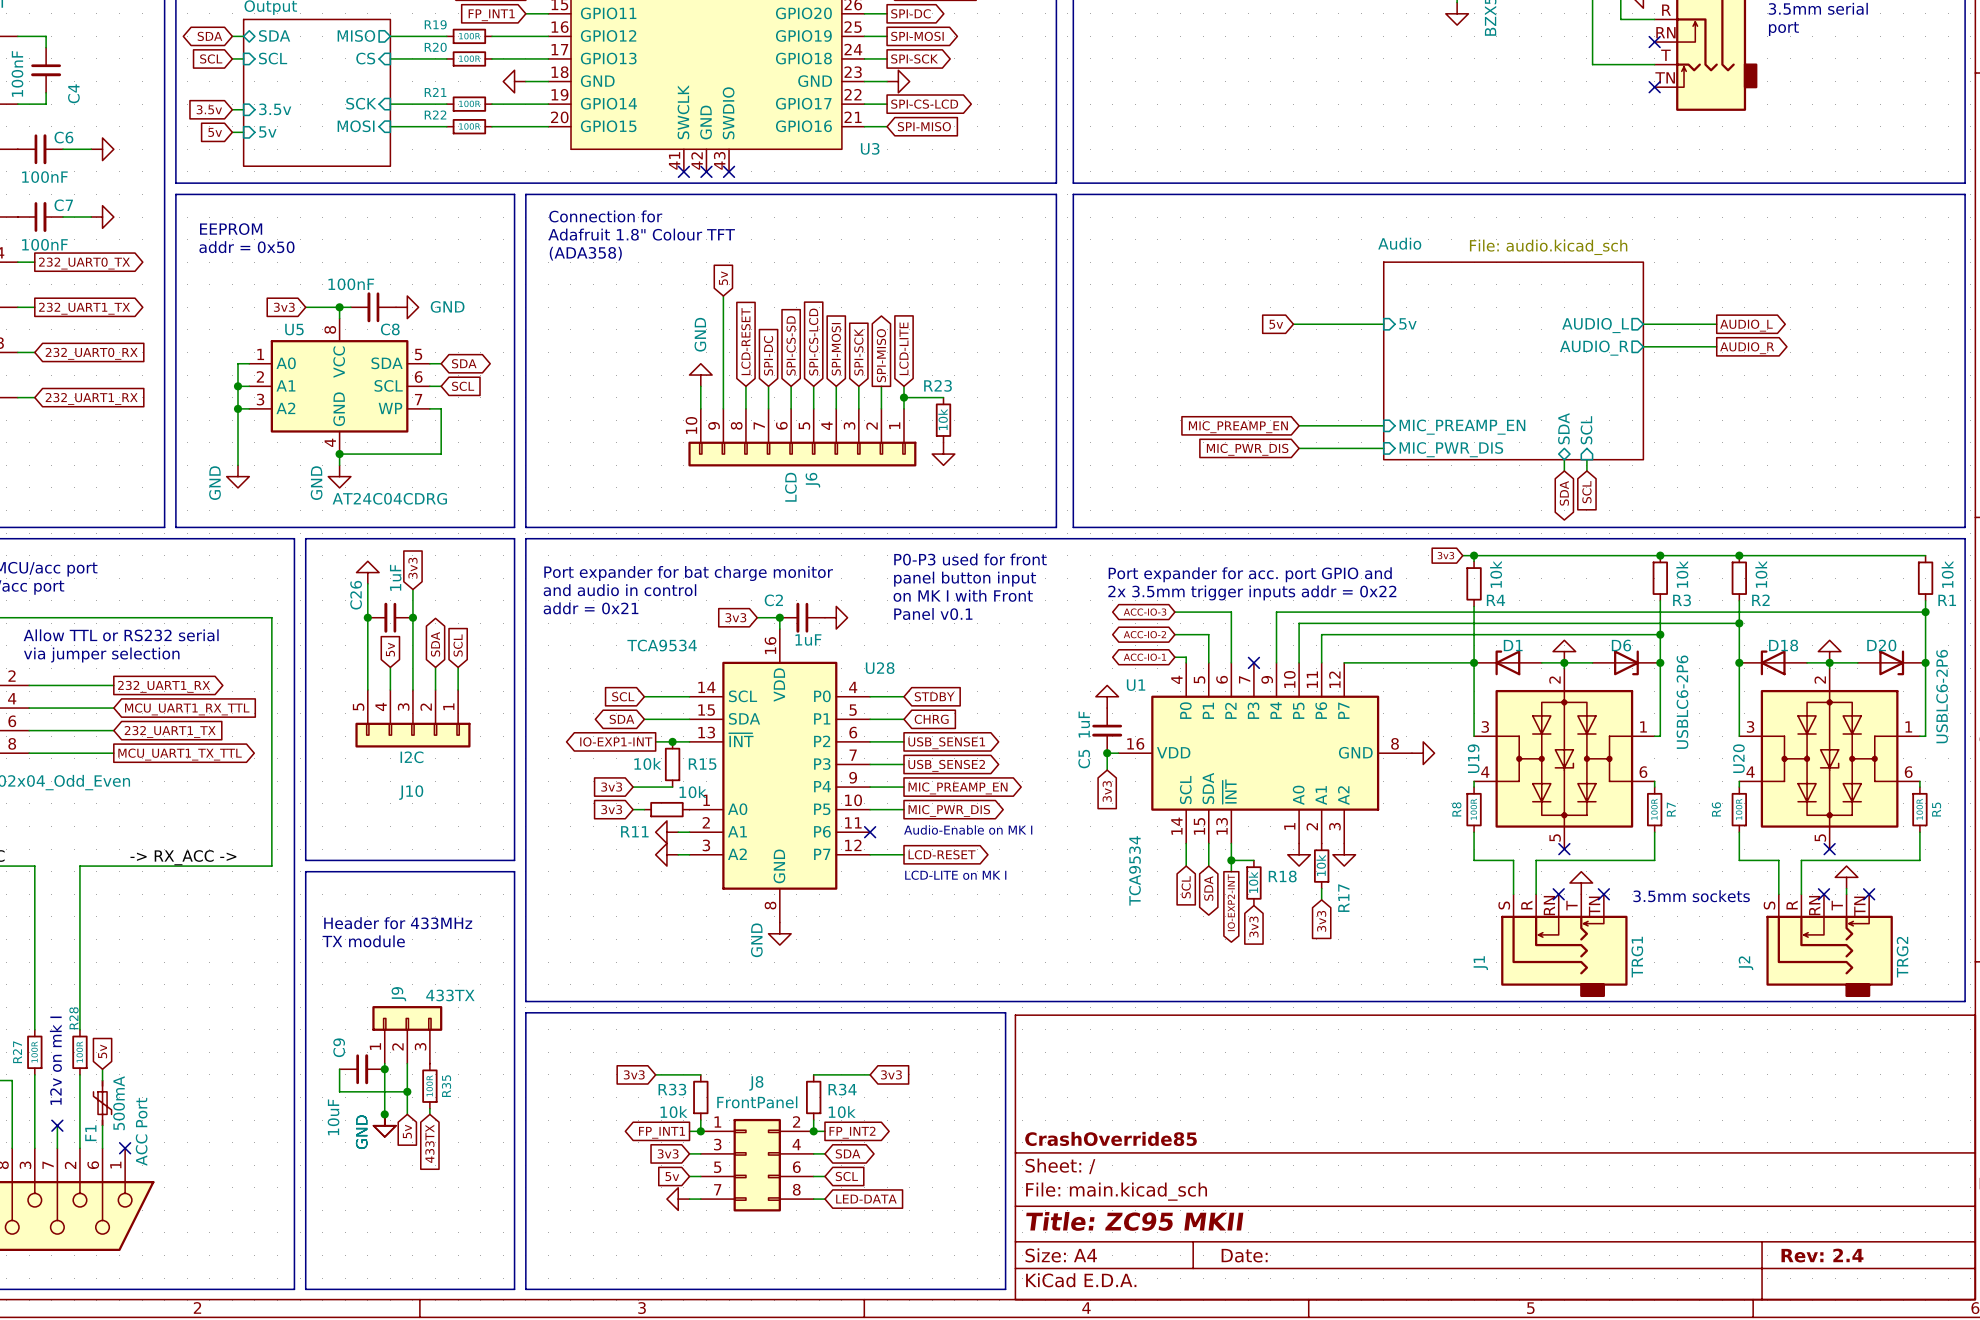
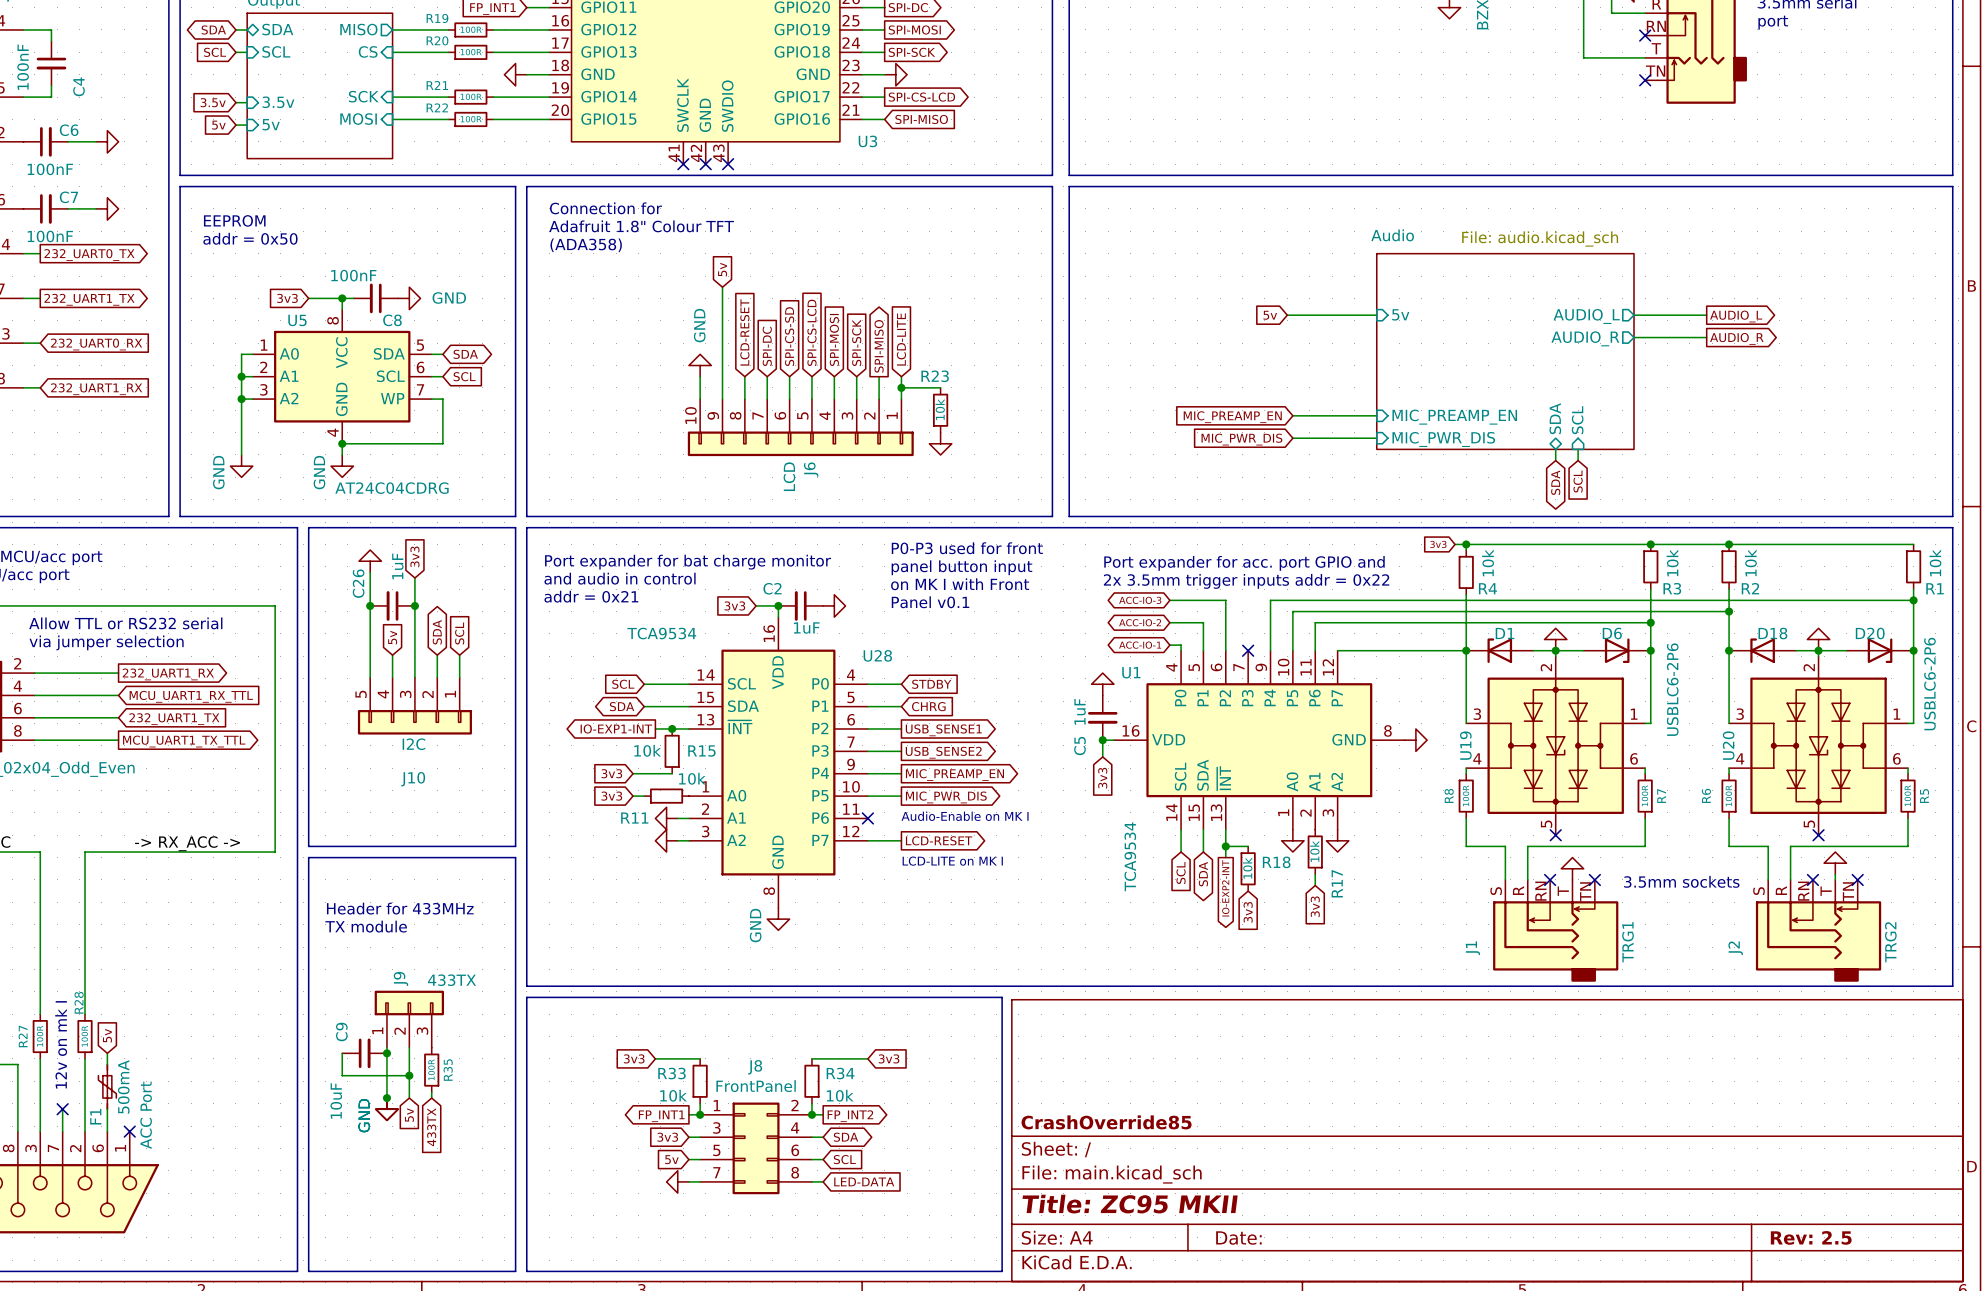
title block: Rev: 2.4 (1822, 1255) -> Rev: 2.5 (1811, 1237)

